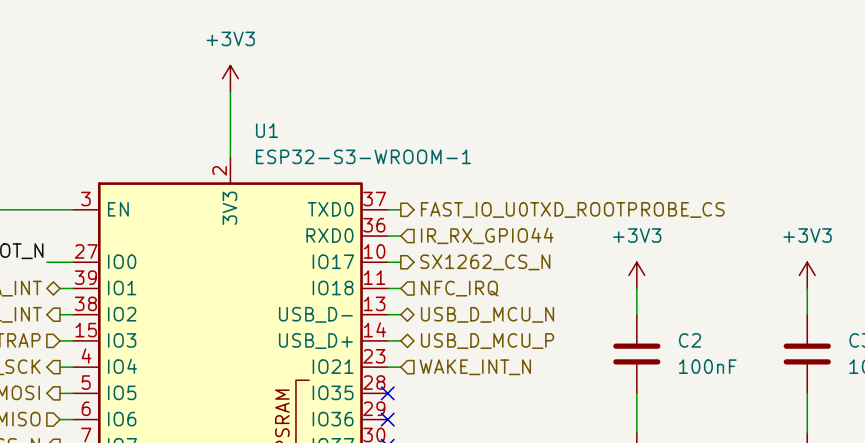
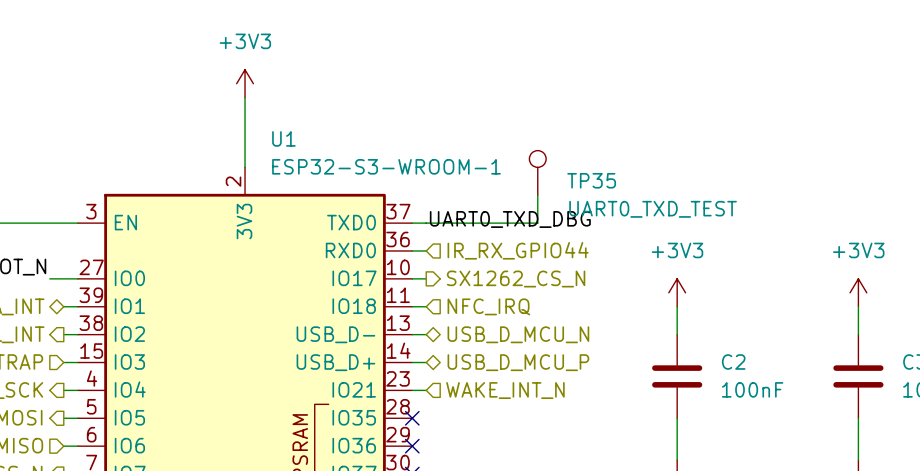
TP35: none -> UART0_TXD_TEST (537, 172)
wire: none -> (537, 195) (537, 223) (426, 223)
label: none -> UART0_TXD_DBG (510, 219)
hierarchical label: FAST_IO_U0TXD_ROOTPROBE_CS (572, 209) -> none

